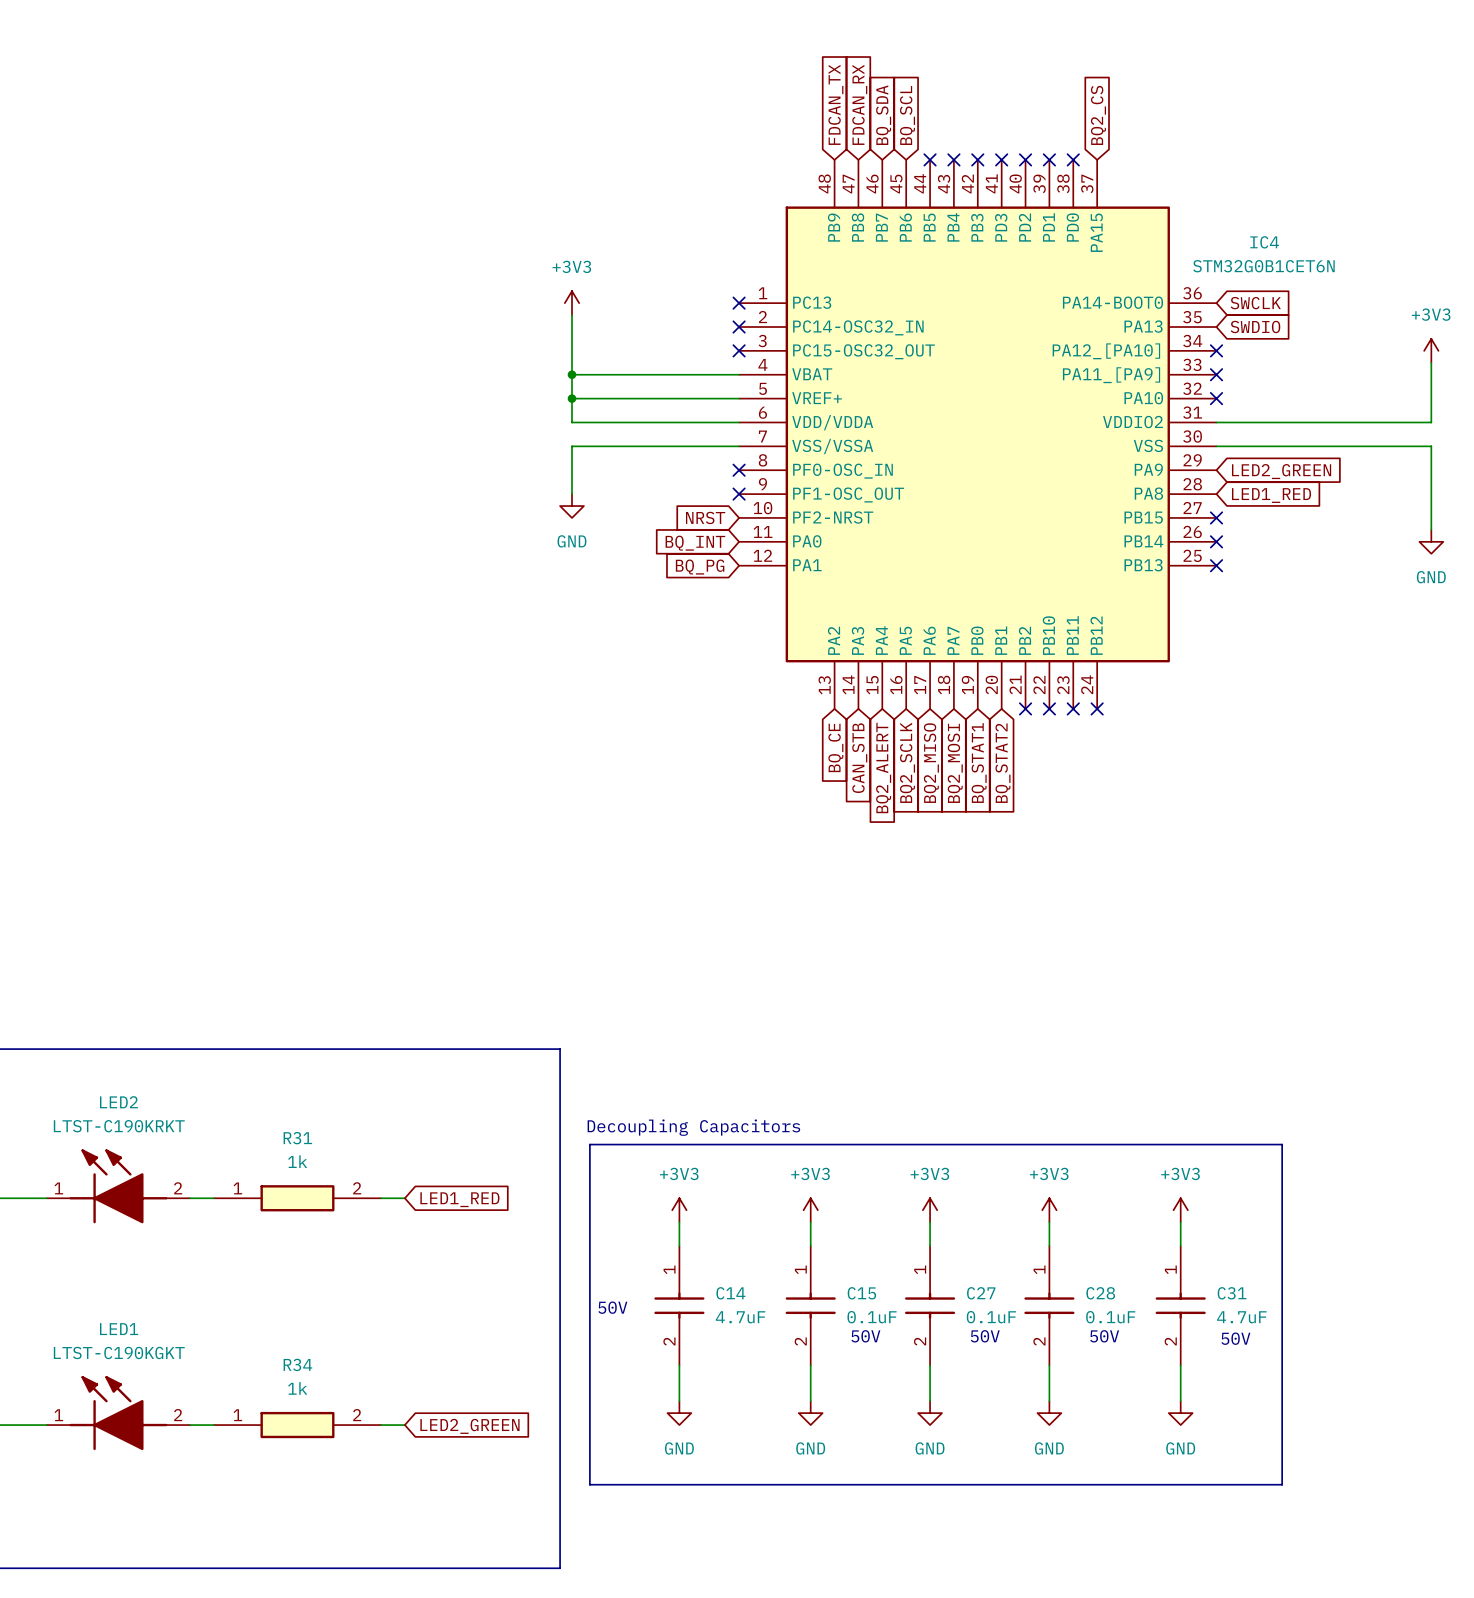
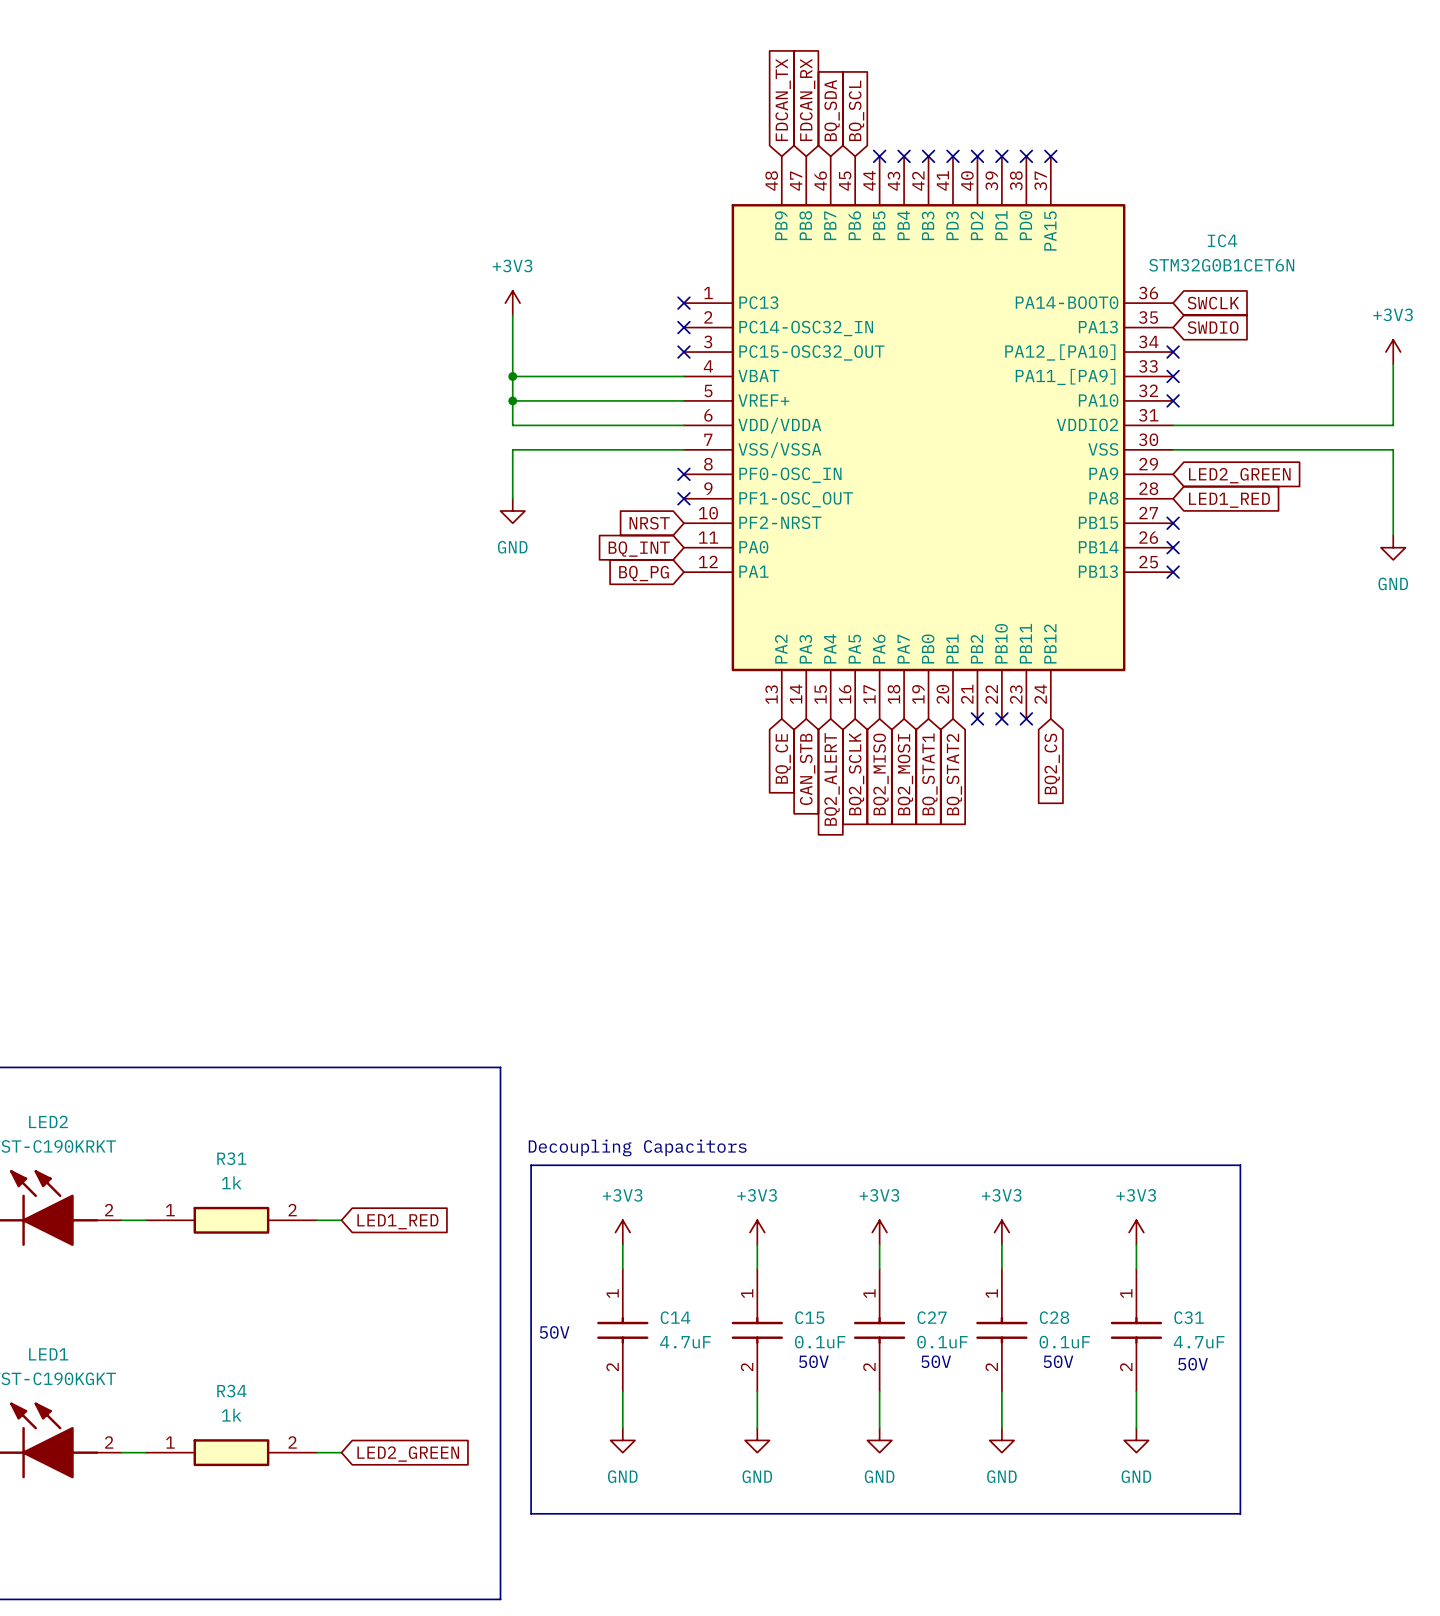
global label: BQ2_CS (1098, 115) -> none
no-connect mark: none -> (1050, 156)
no-connect mark: (1097, 708) -> none
global label: none -> BQ2_CS (1052, 763)

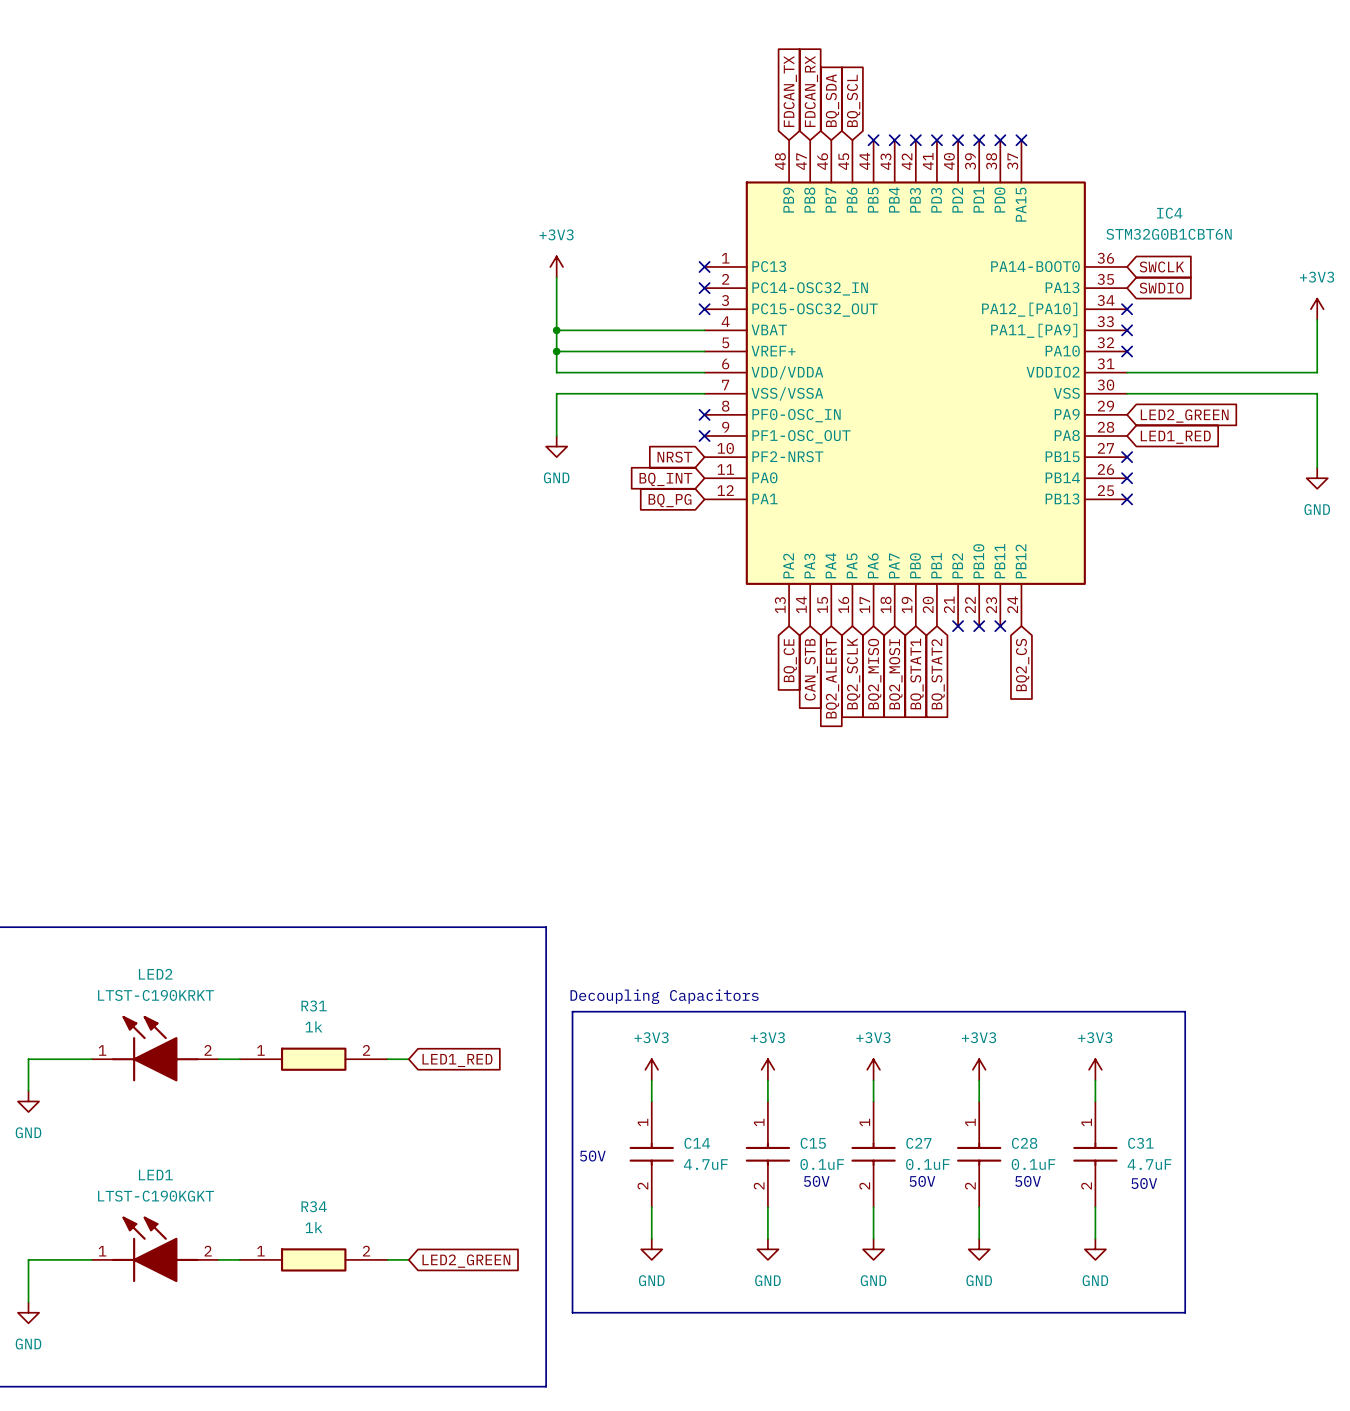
IC4 value: STM32G0B1CET6N (1221, 265) -> STM32G0B1CBT6N (1169, 234)

